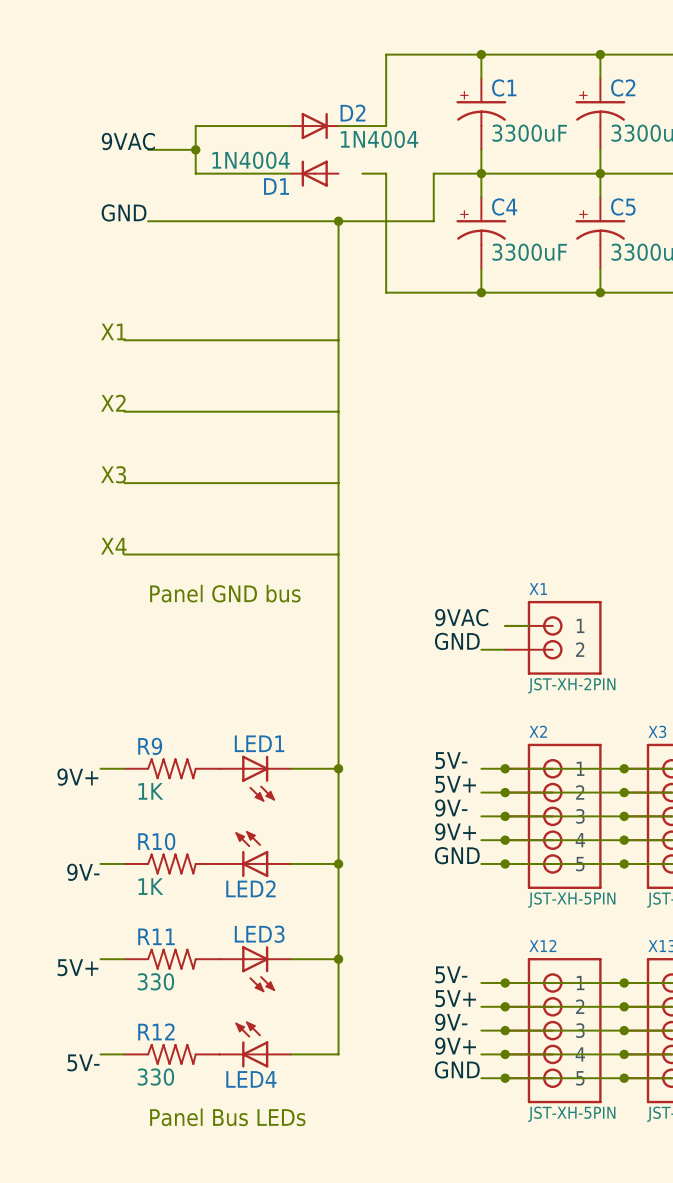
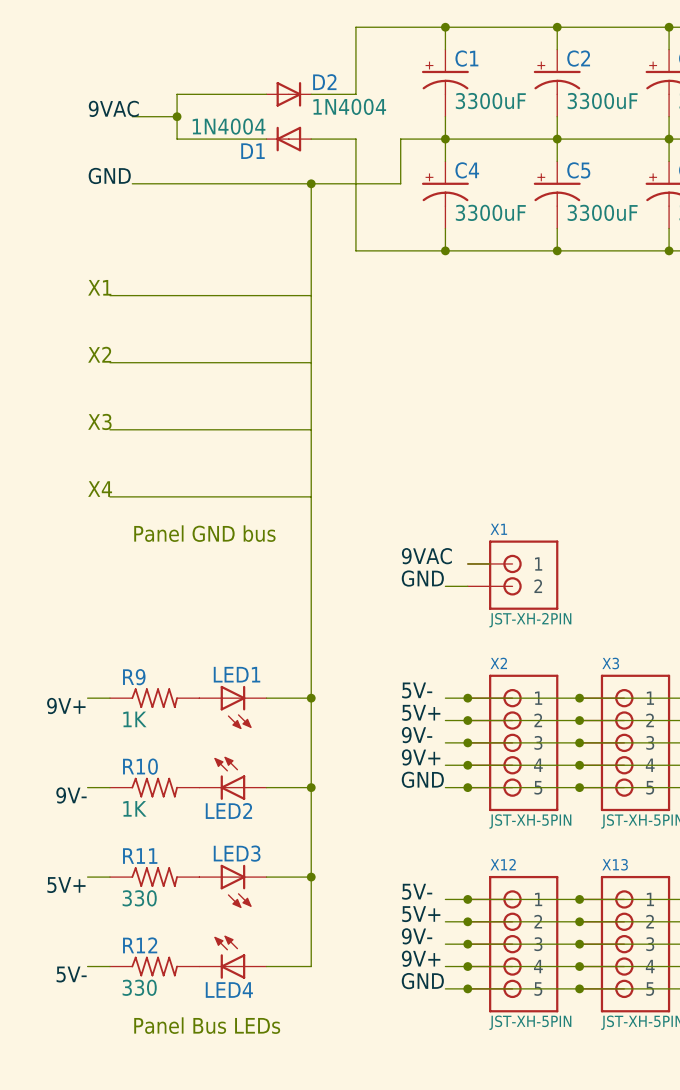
wire: none -> (311, 139) (333, 139)

